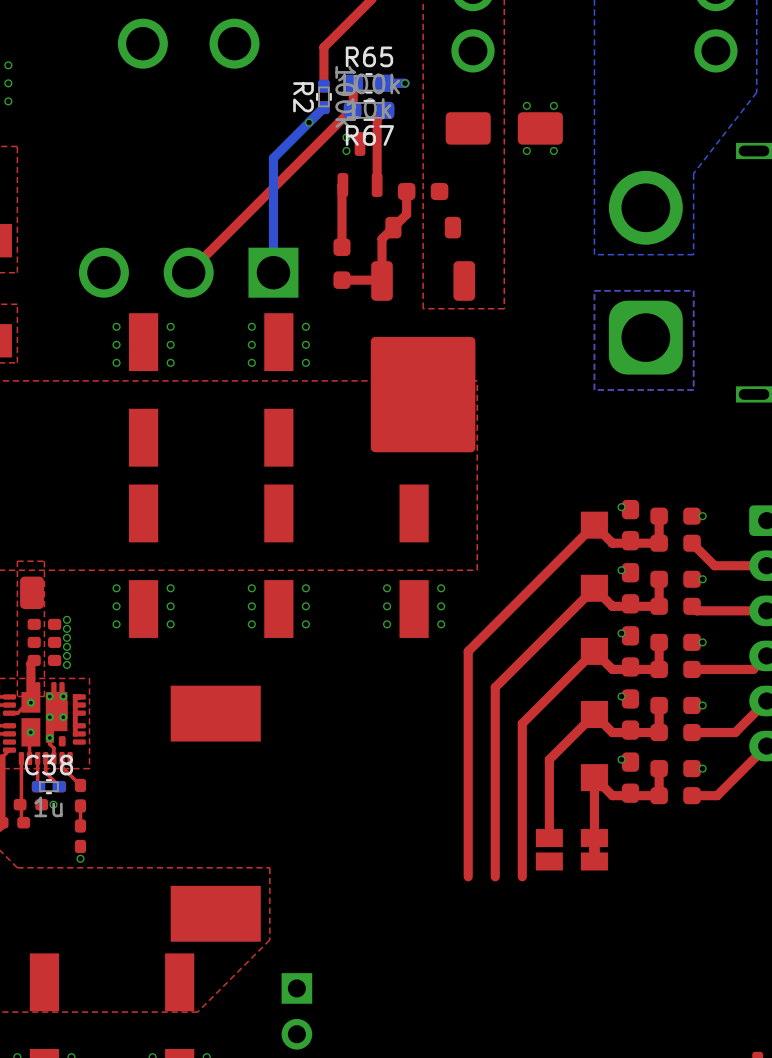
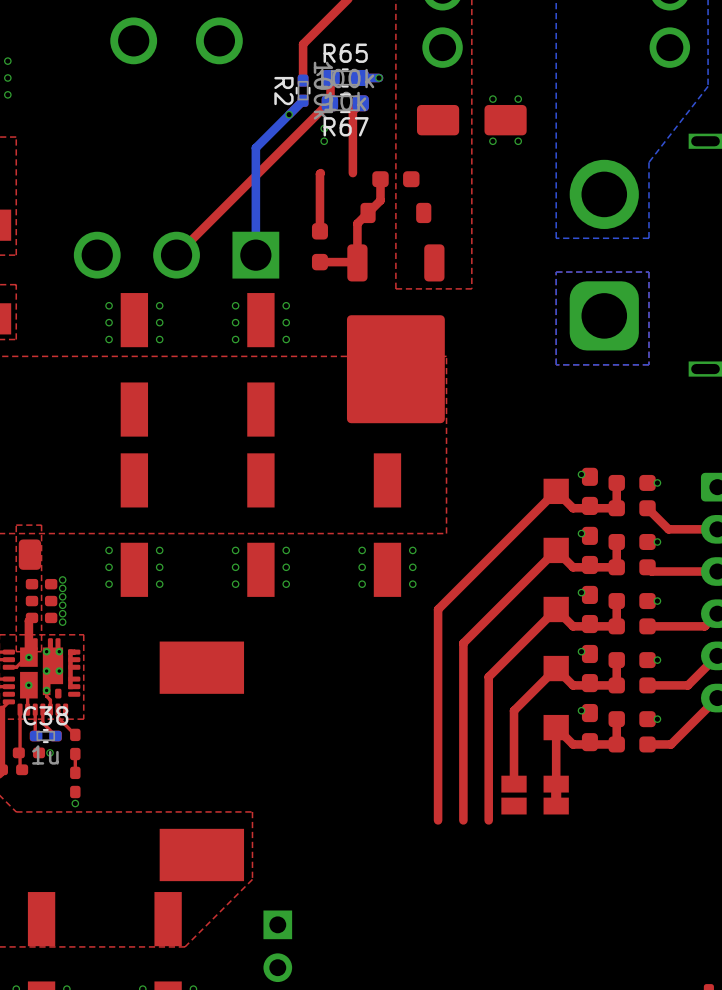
part: (360, 164) -> none

